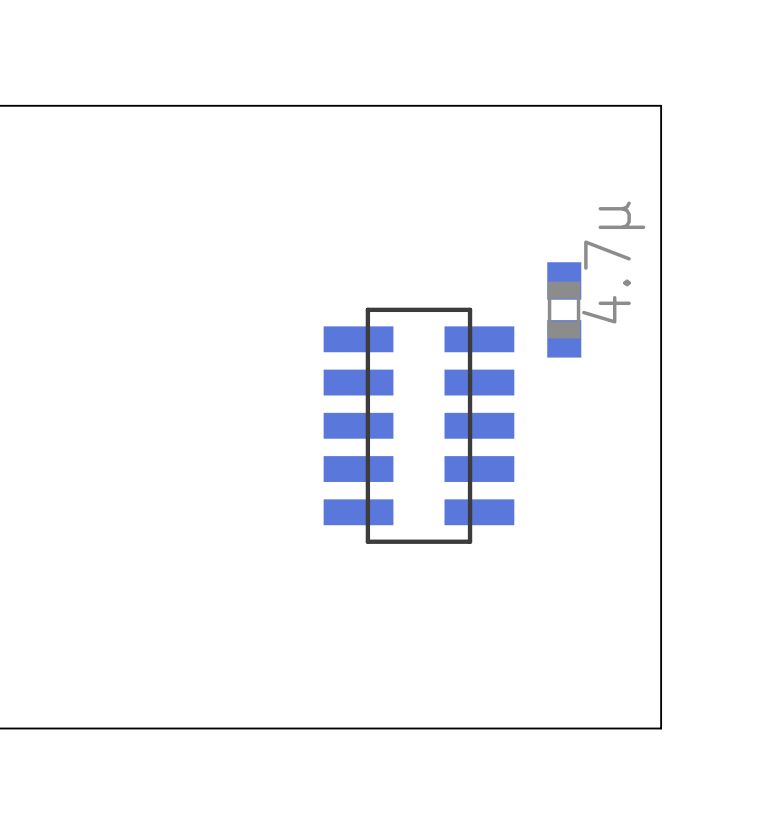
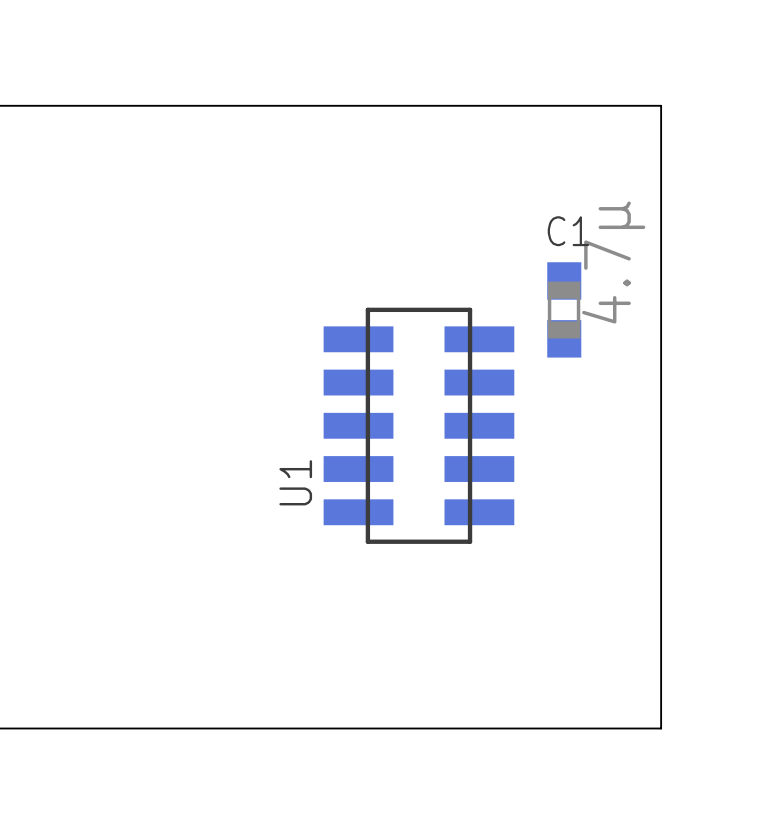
C1 name: none -> C1 (568, 231)
U1 name: none -> U1 (295, 482)

